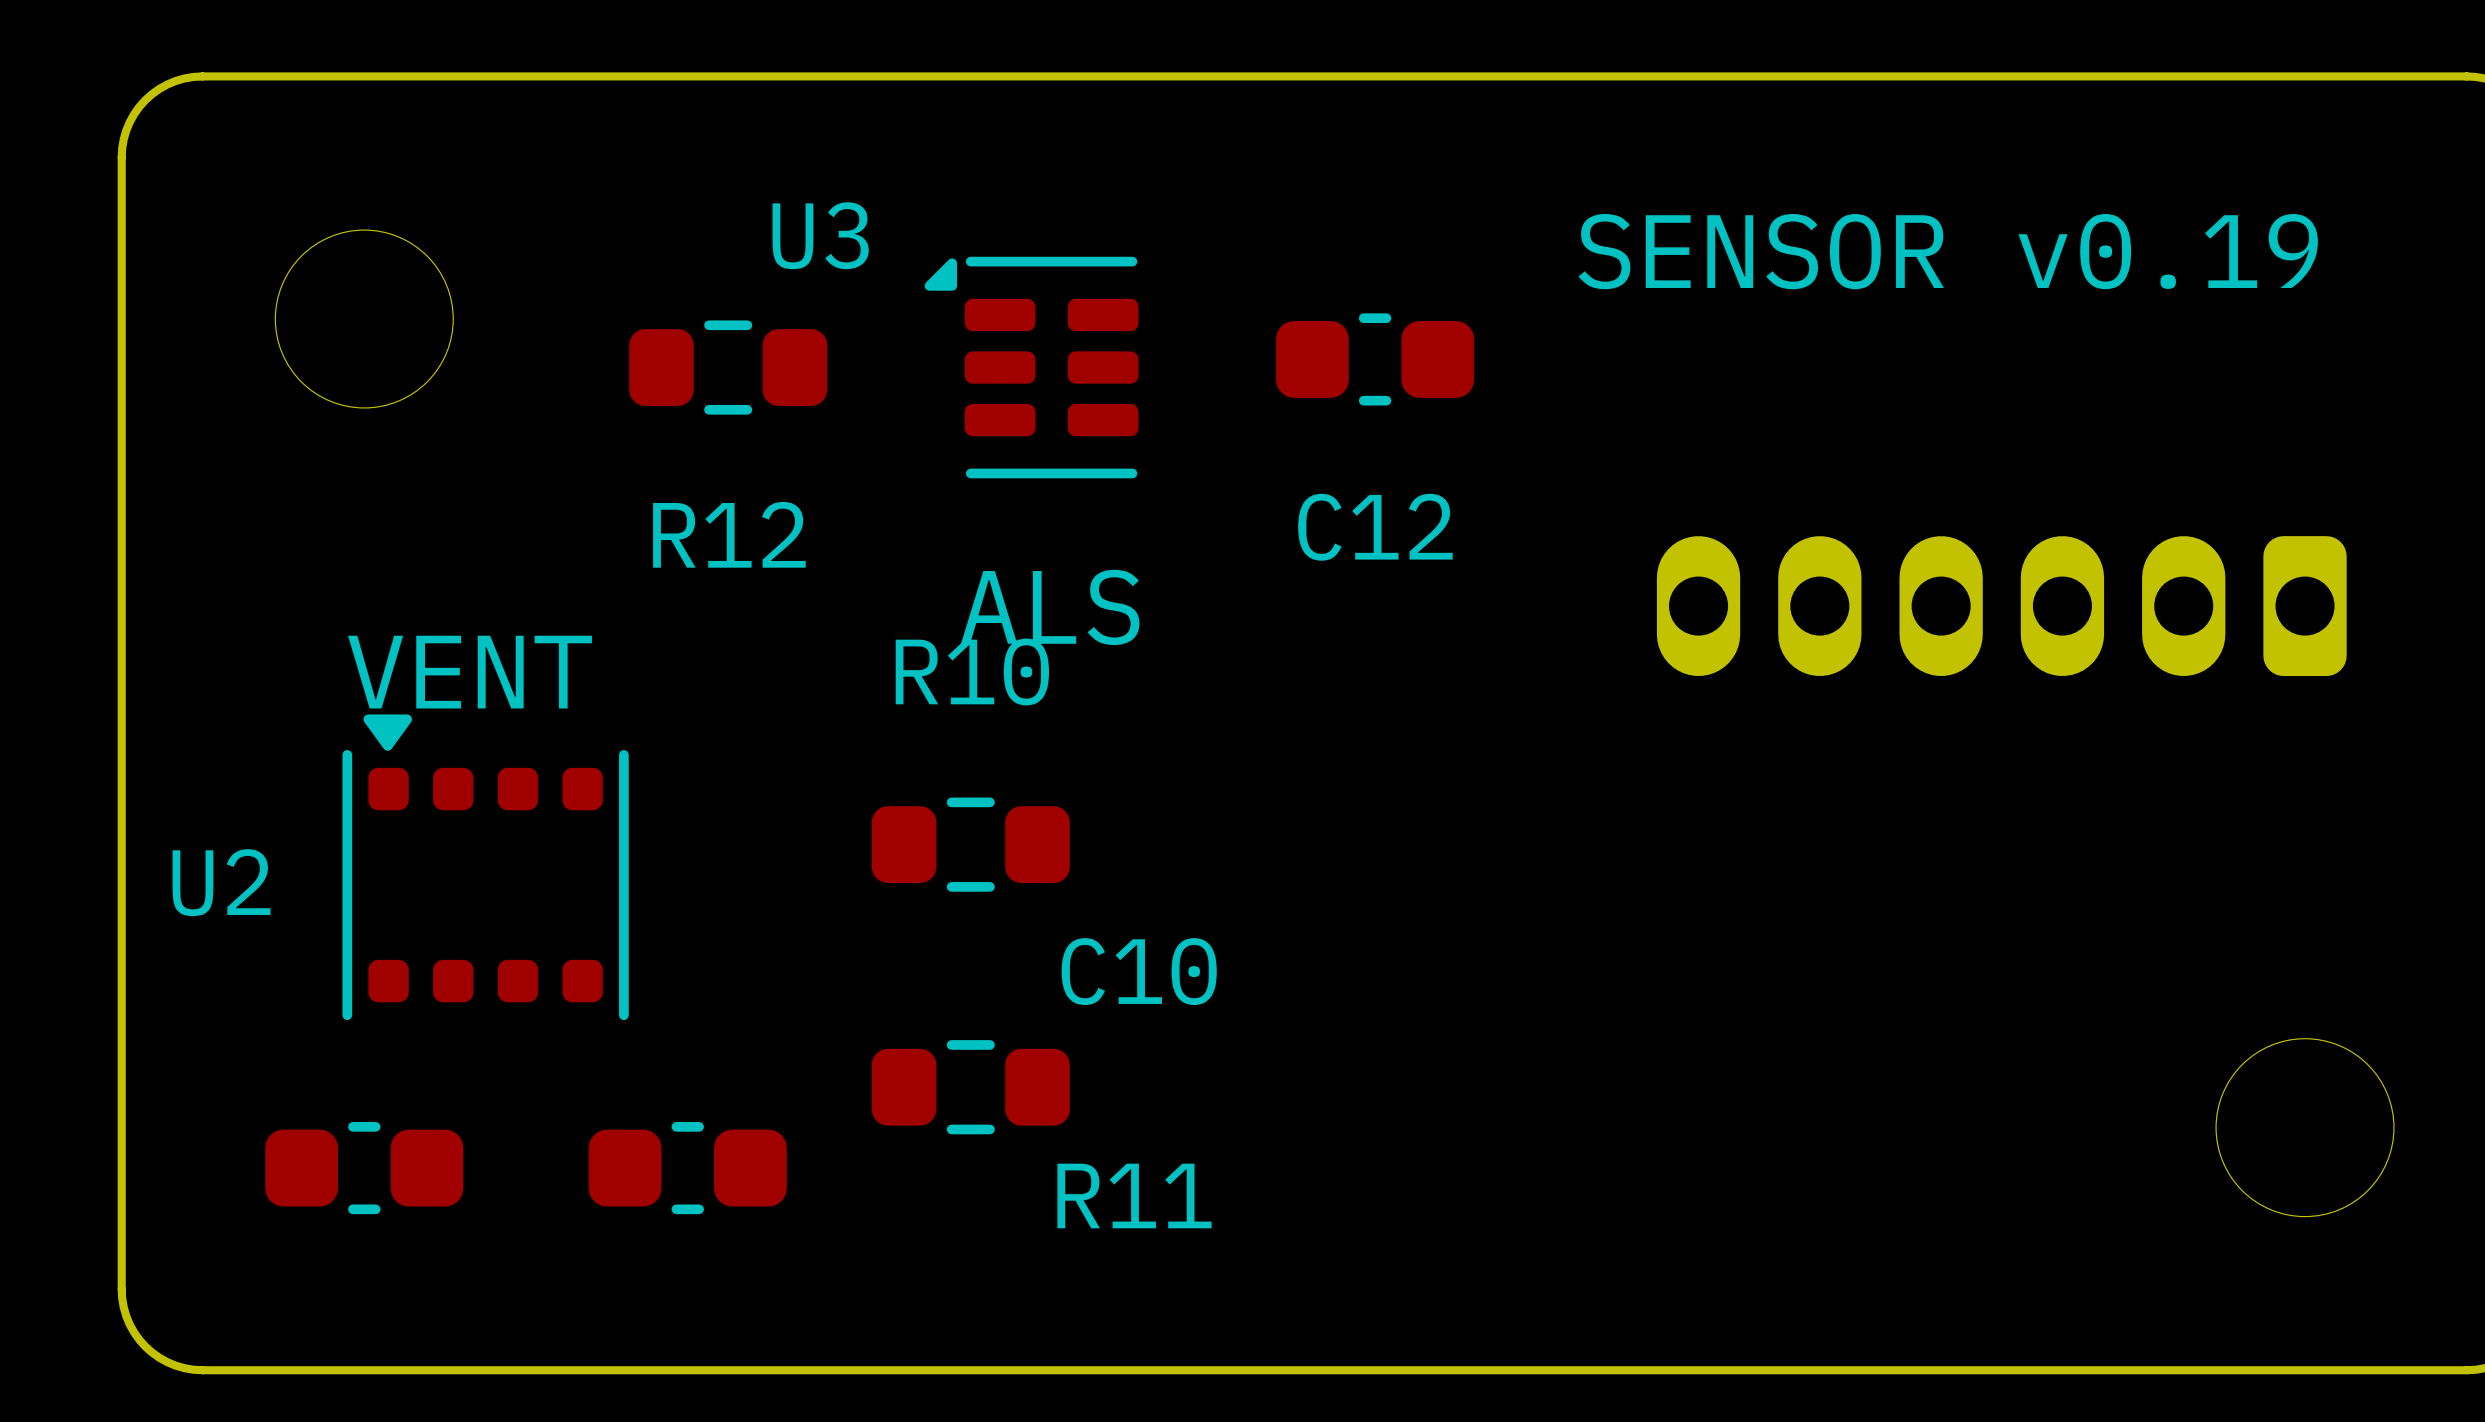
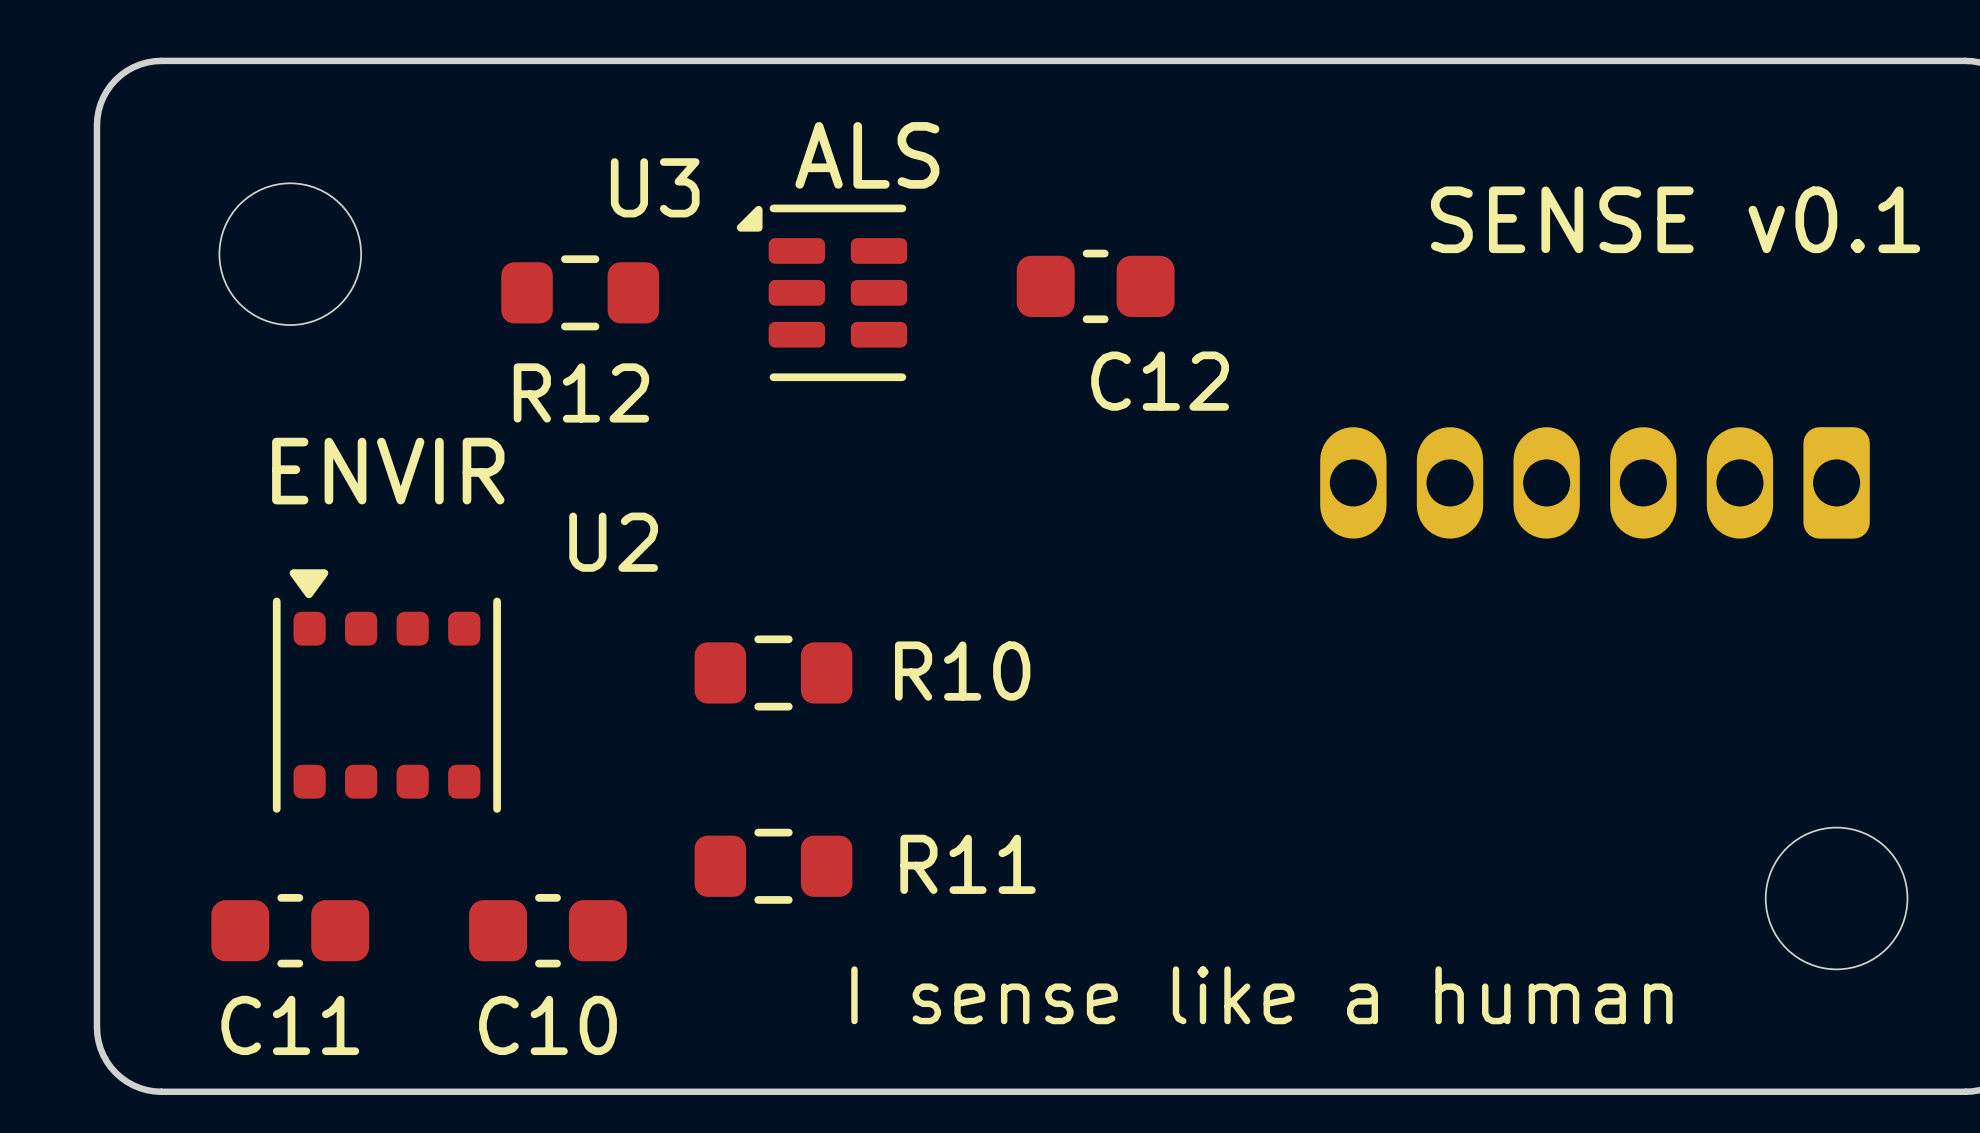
text: SENSOR v0.19 (1948, 251) -> SENSE v0.1 (1675, 219)
C12 name position: C12 (1375, 527) -> C12 (1160, 381)
R12 name position: R12 (729, 534) -> R12 (581, 392)
text: none -> ENVIR (388, 471)
text position: ALS (1050, 607) -> ALS (867, 155)
R10 name position: R10 (972, 671) -> R10 (962, 671)
text: VENT (469, 672) -> none
U2 name position: U2 (221, 882) -> U2 (613, 542)
C10 name position: C10 (1139, 971) -> C10 (547, 1025)
R11 name position: R11 (1134, 1195) -> R11 (968, 864)
text: none -> I sense like a human (1261, 995)
text: none -> C11 (290, 1025)

